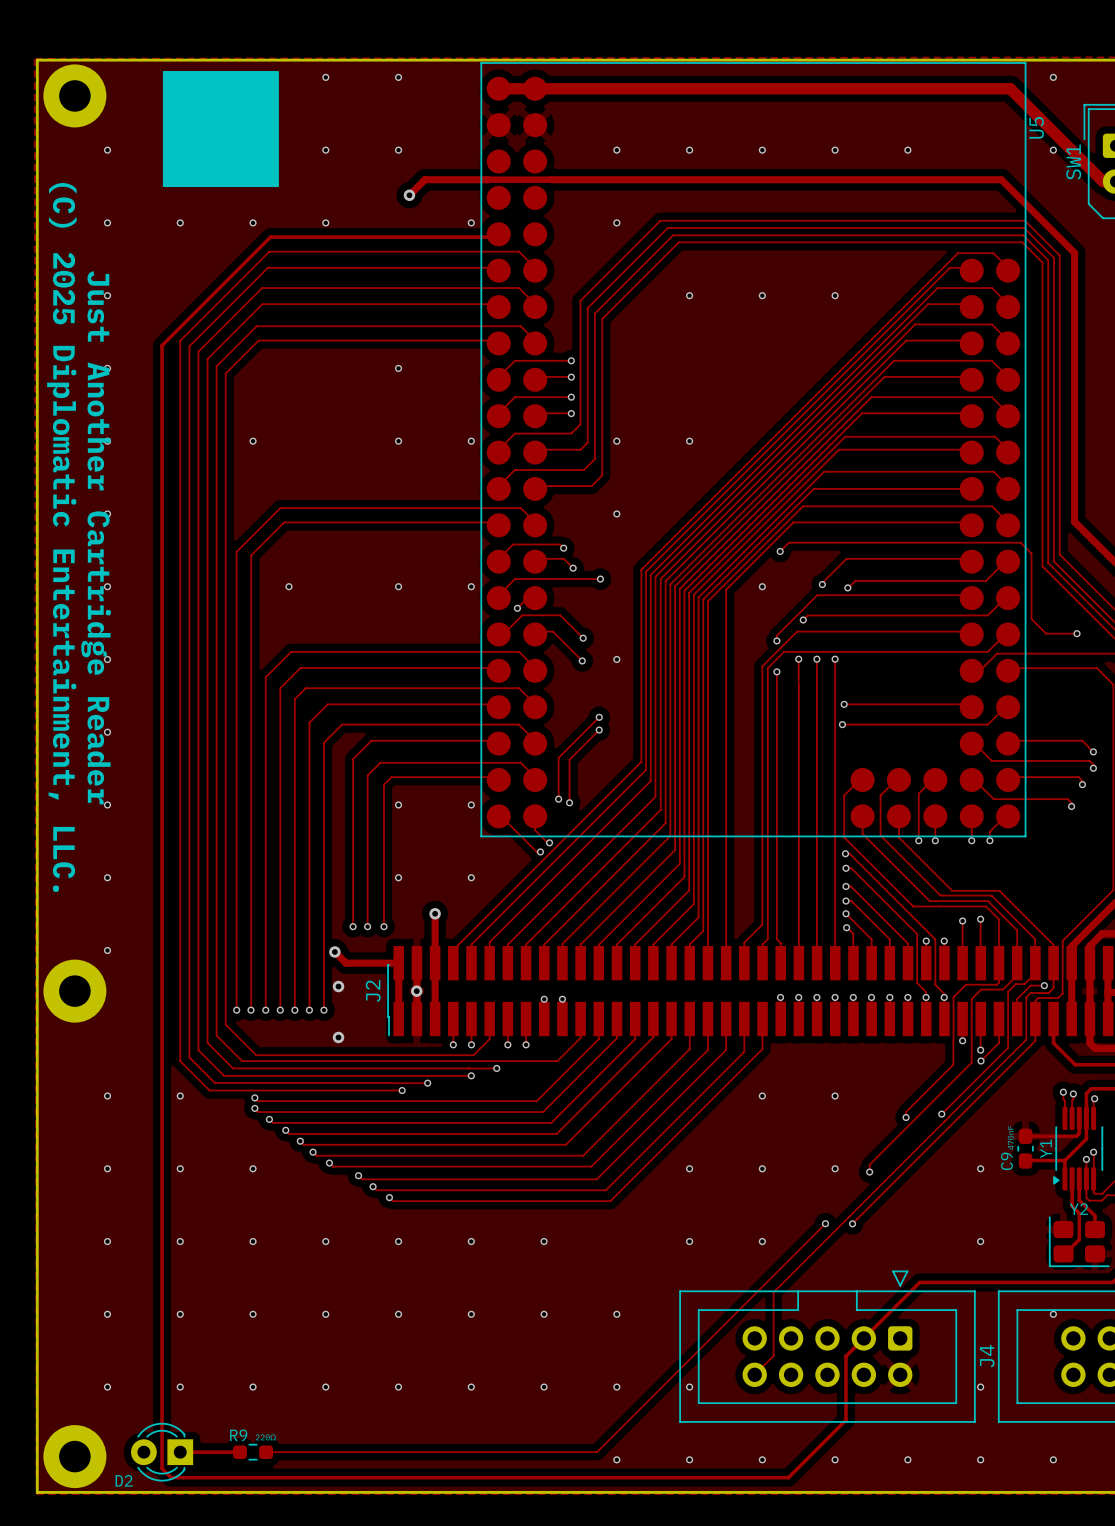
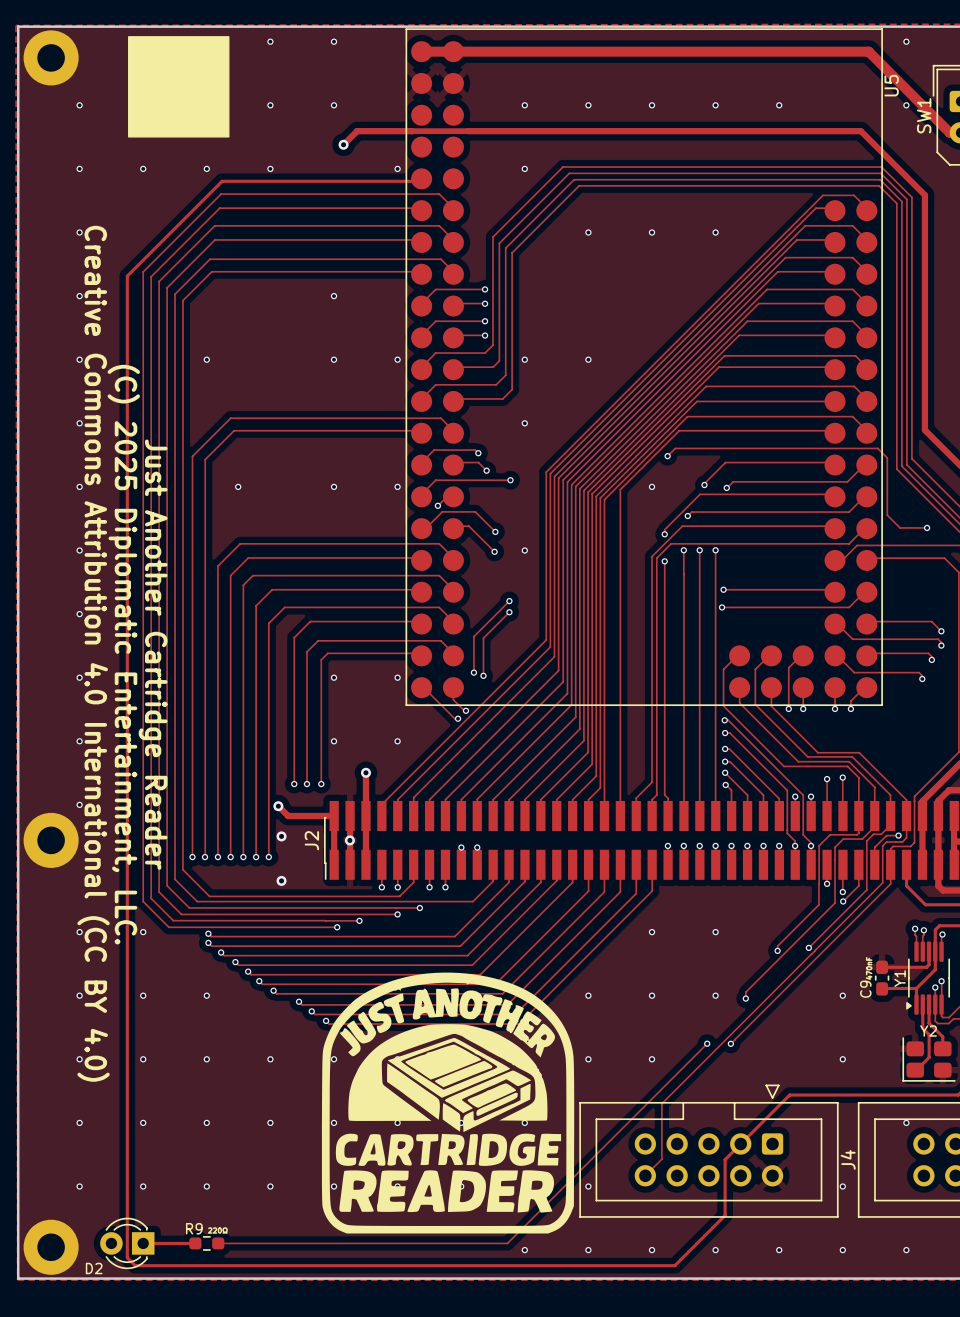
text position: (C) 2025 Diplomatic Entertainment, LLC. (61, 537) -> (C) 2025 Diplomatic Entertainment, LLC. (123, 654)
text position: Just Another Cartridge Reader (96, 537) -> Just Another Cartridge Reader (153, 654)
text: none -> Creative Commons Attribution 4.0 International (CC BY 4.0) (93, 653)
drawing: none -> [321, 972, 575, 1234]

